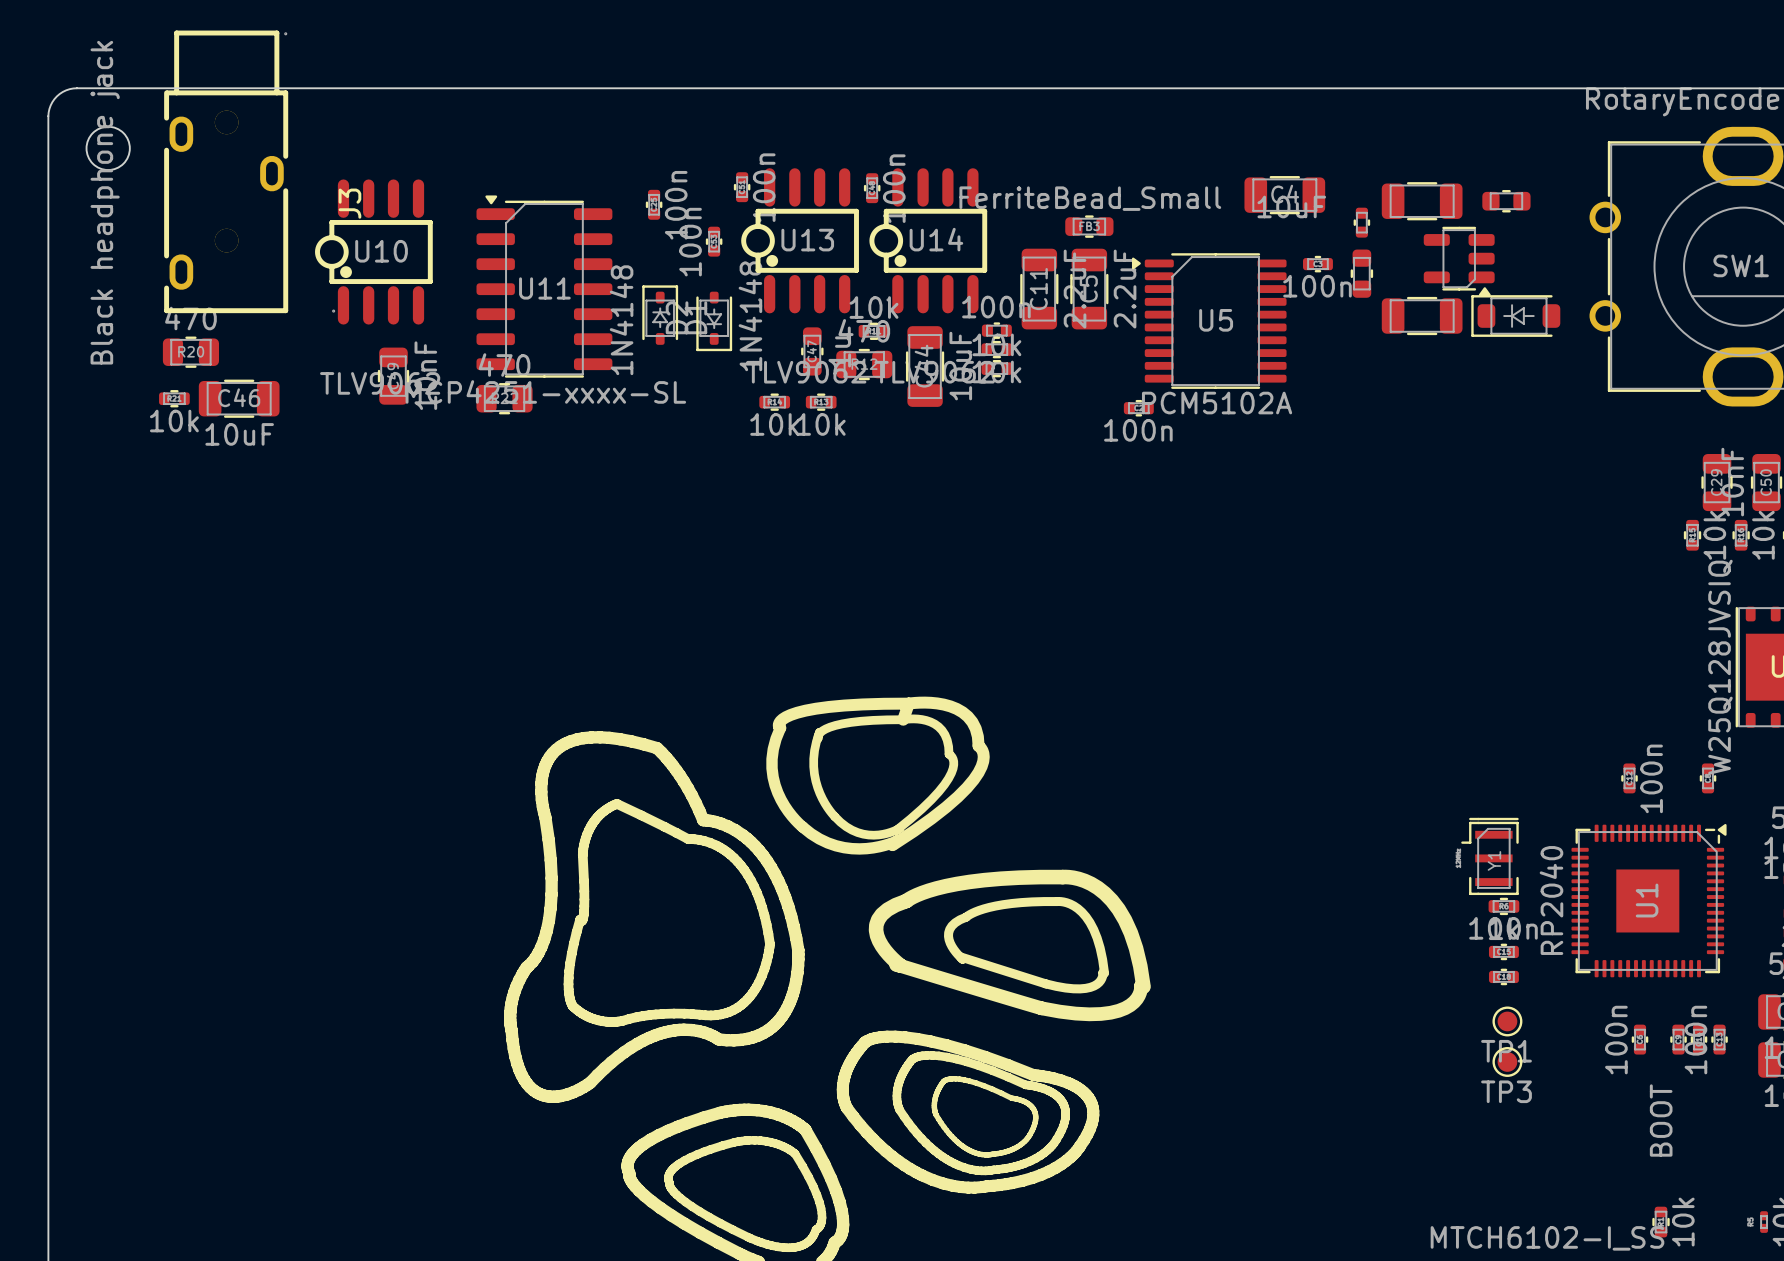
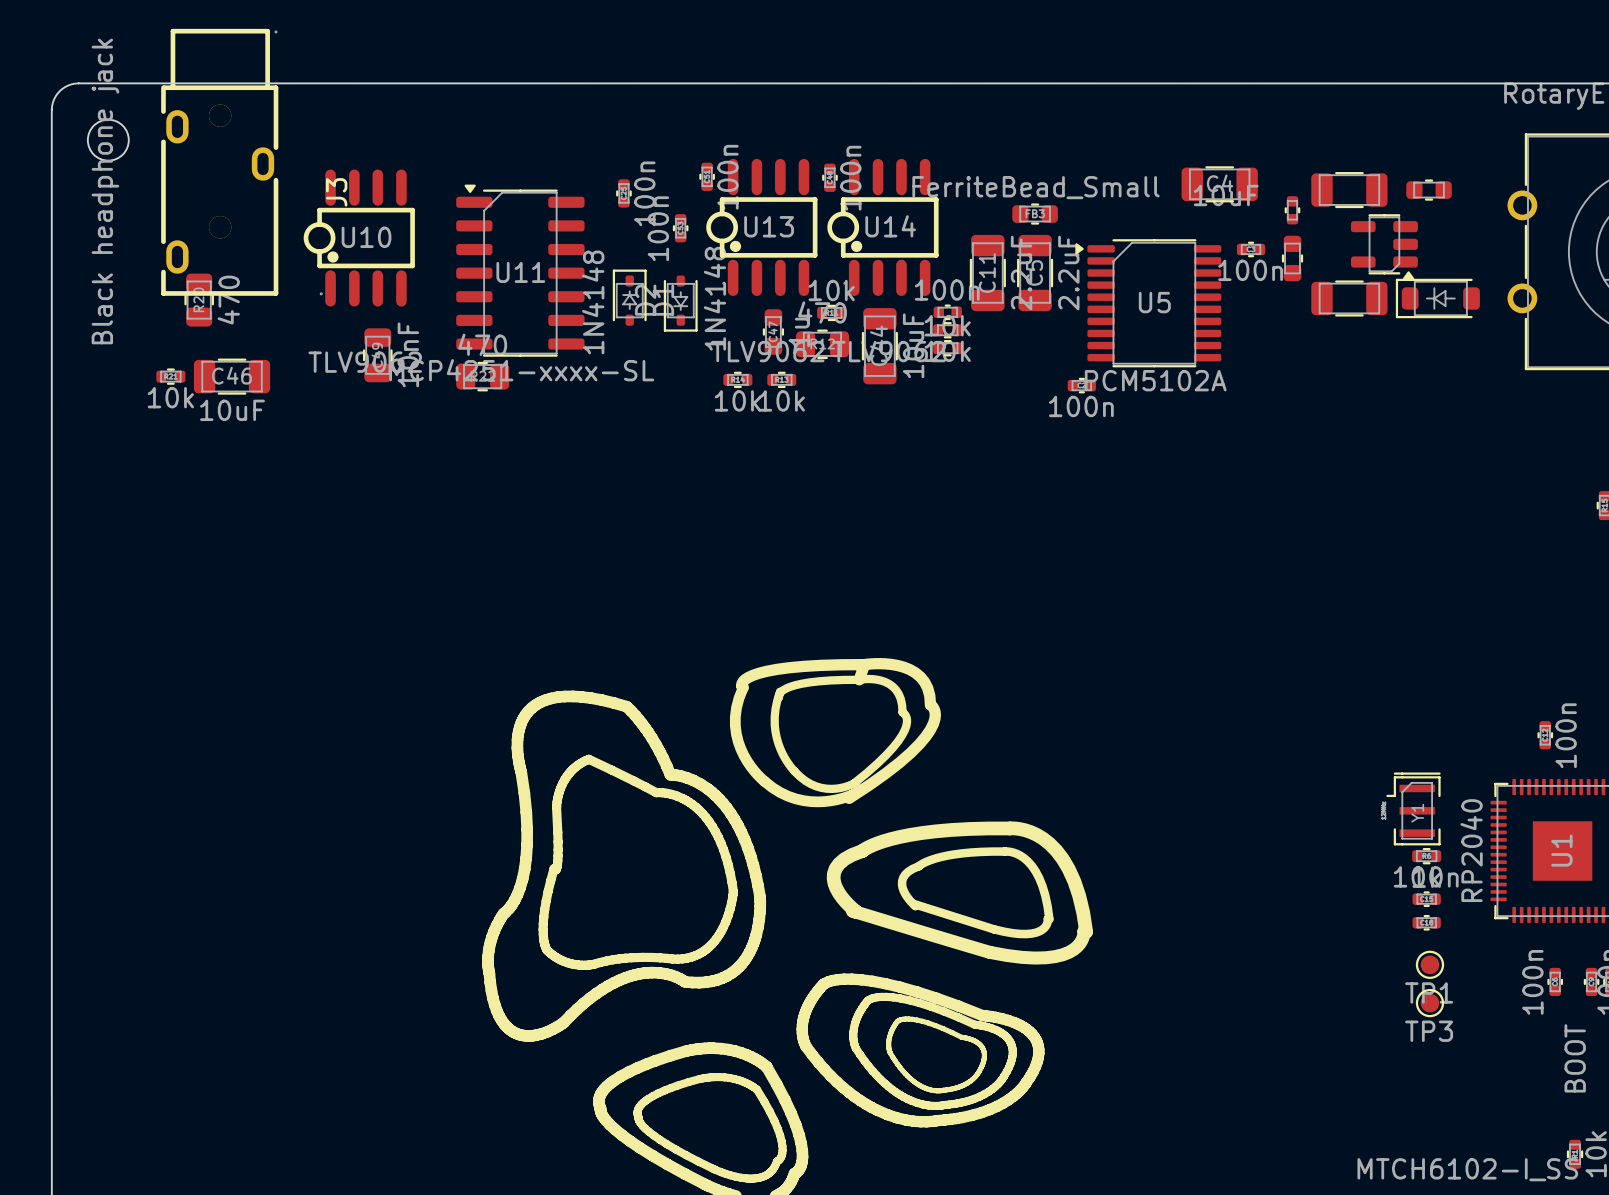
R20 rotation: 0° (190, 352) -> 90° clockwise (199, 300)
R20 position: (190, 352) -> (199, 300)

